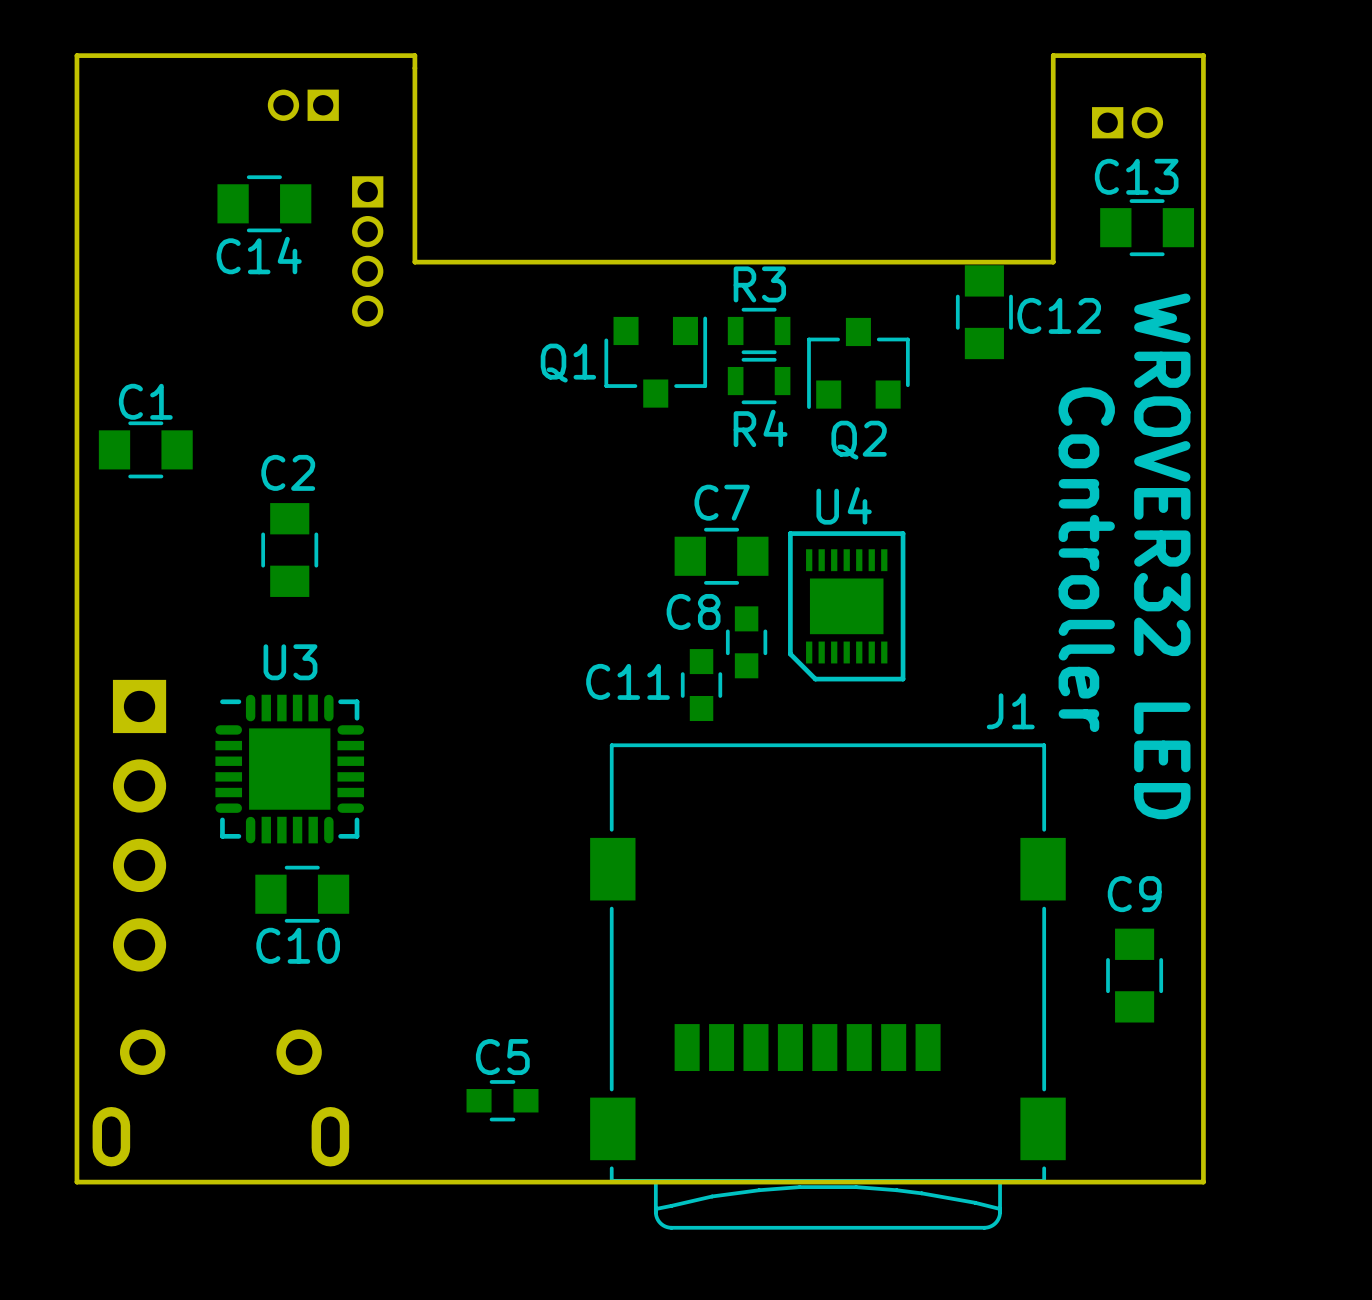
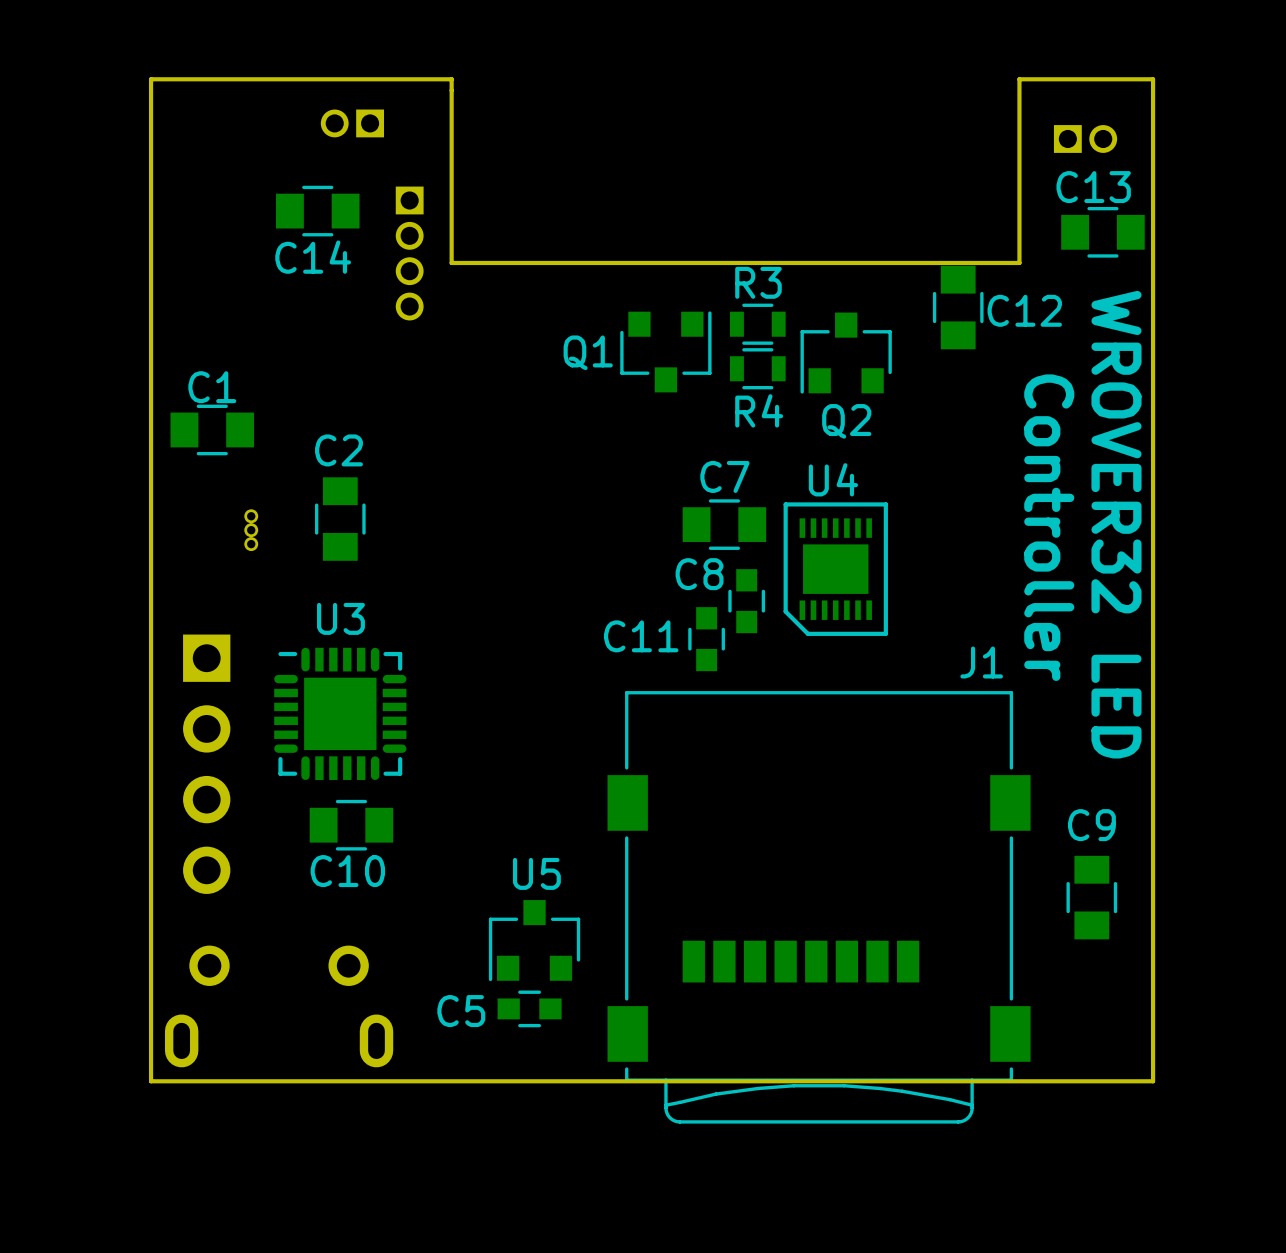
part: none -> (251, 530)
U5: none -> (534, 940)
C5 name position: C5 (502, 1057) -> C5 (461, 1011)

